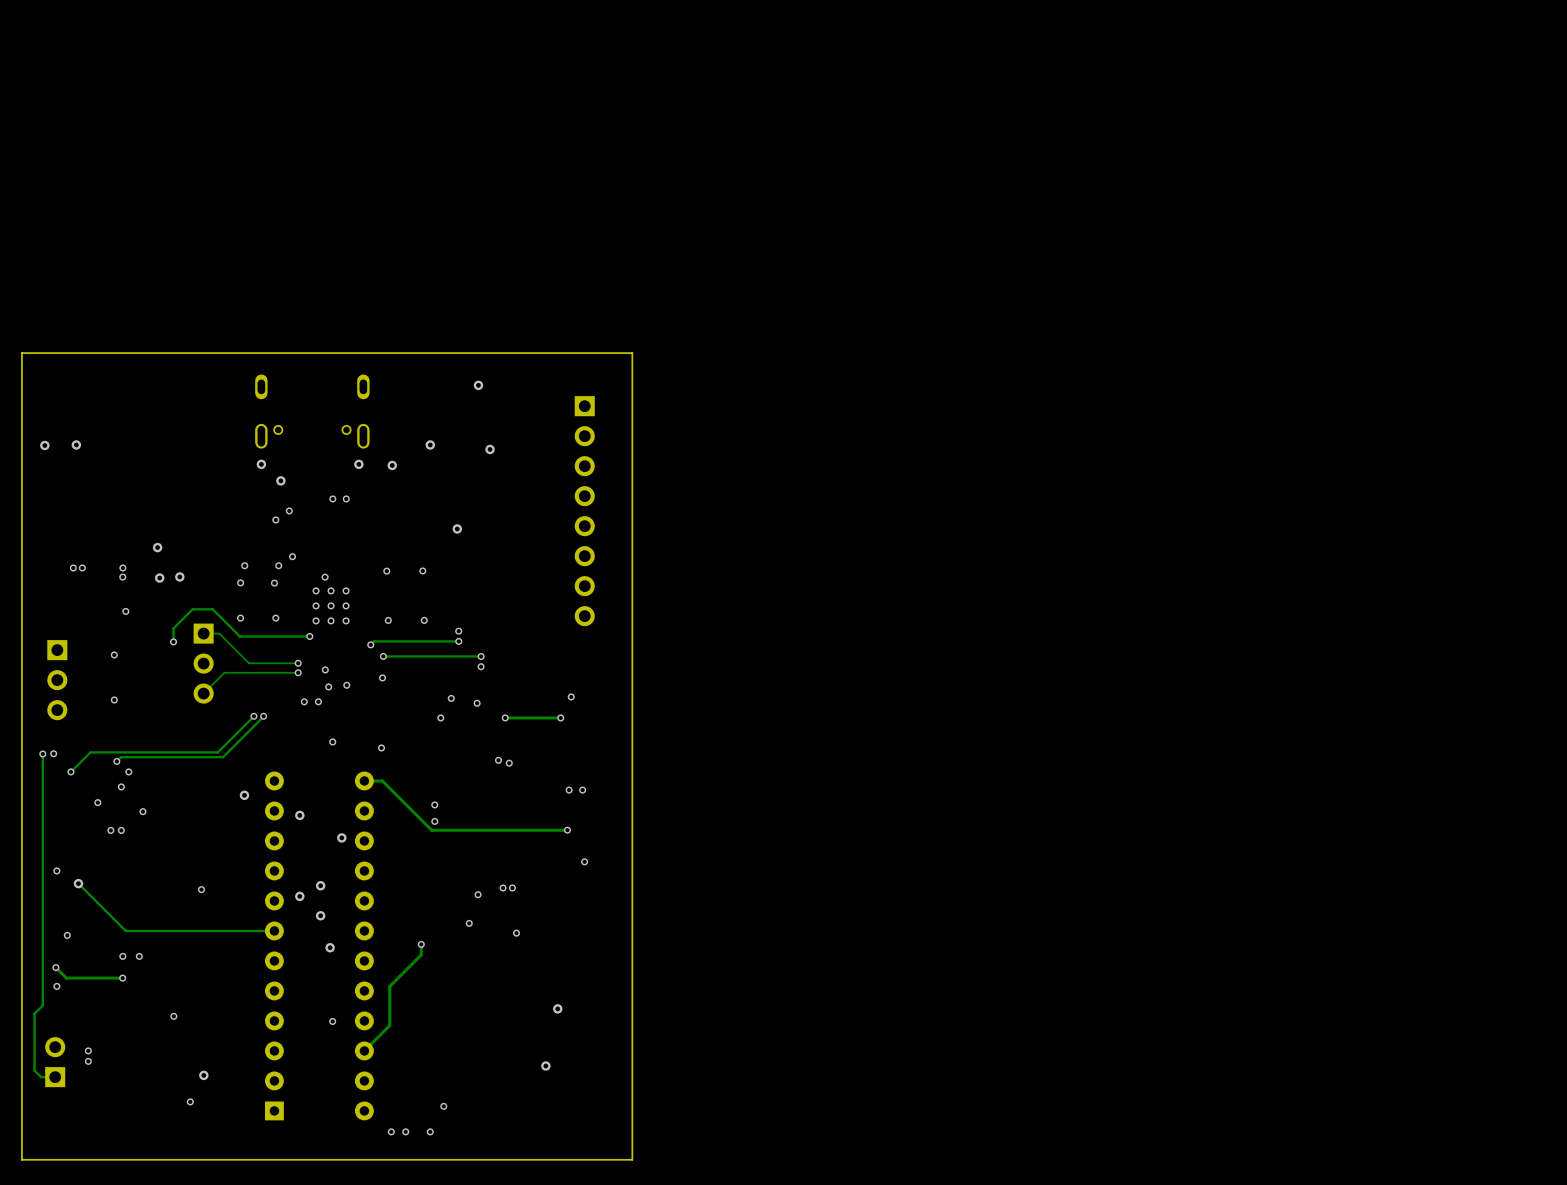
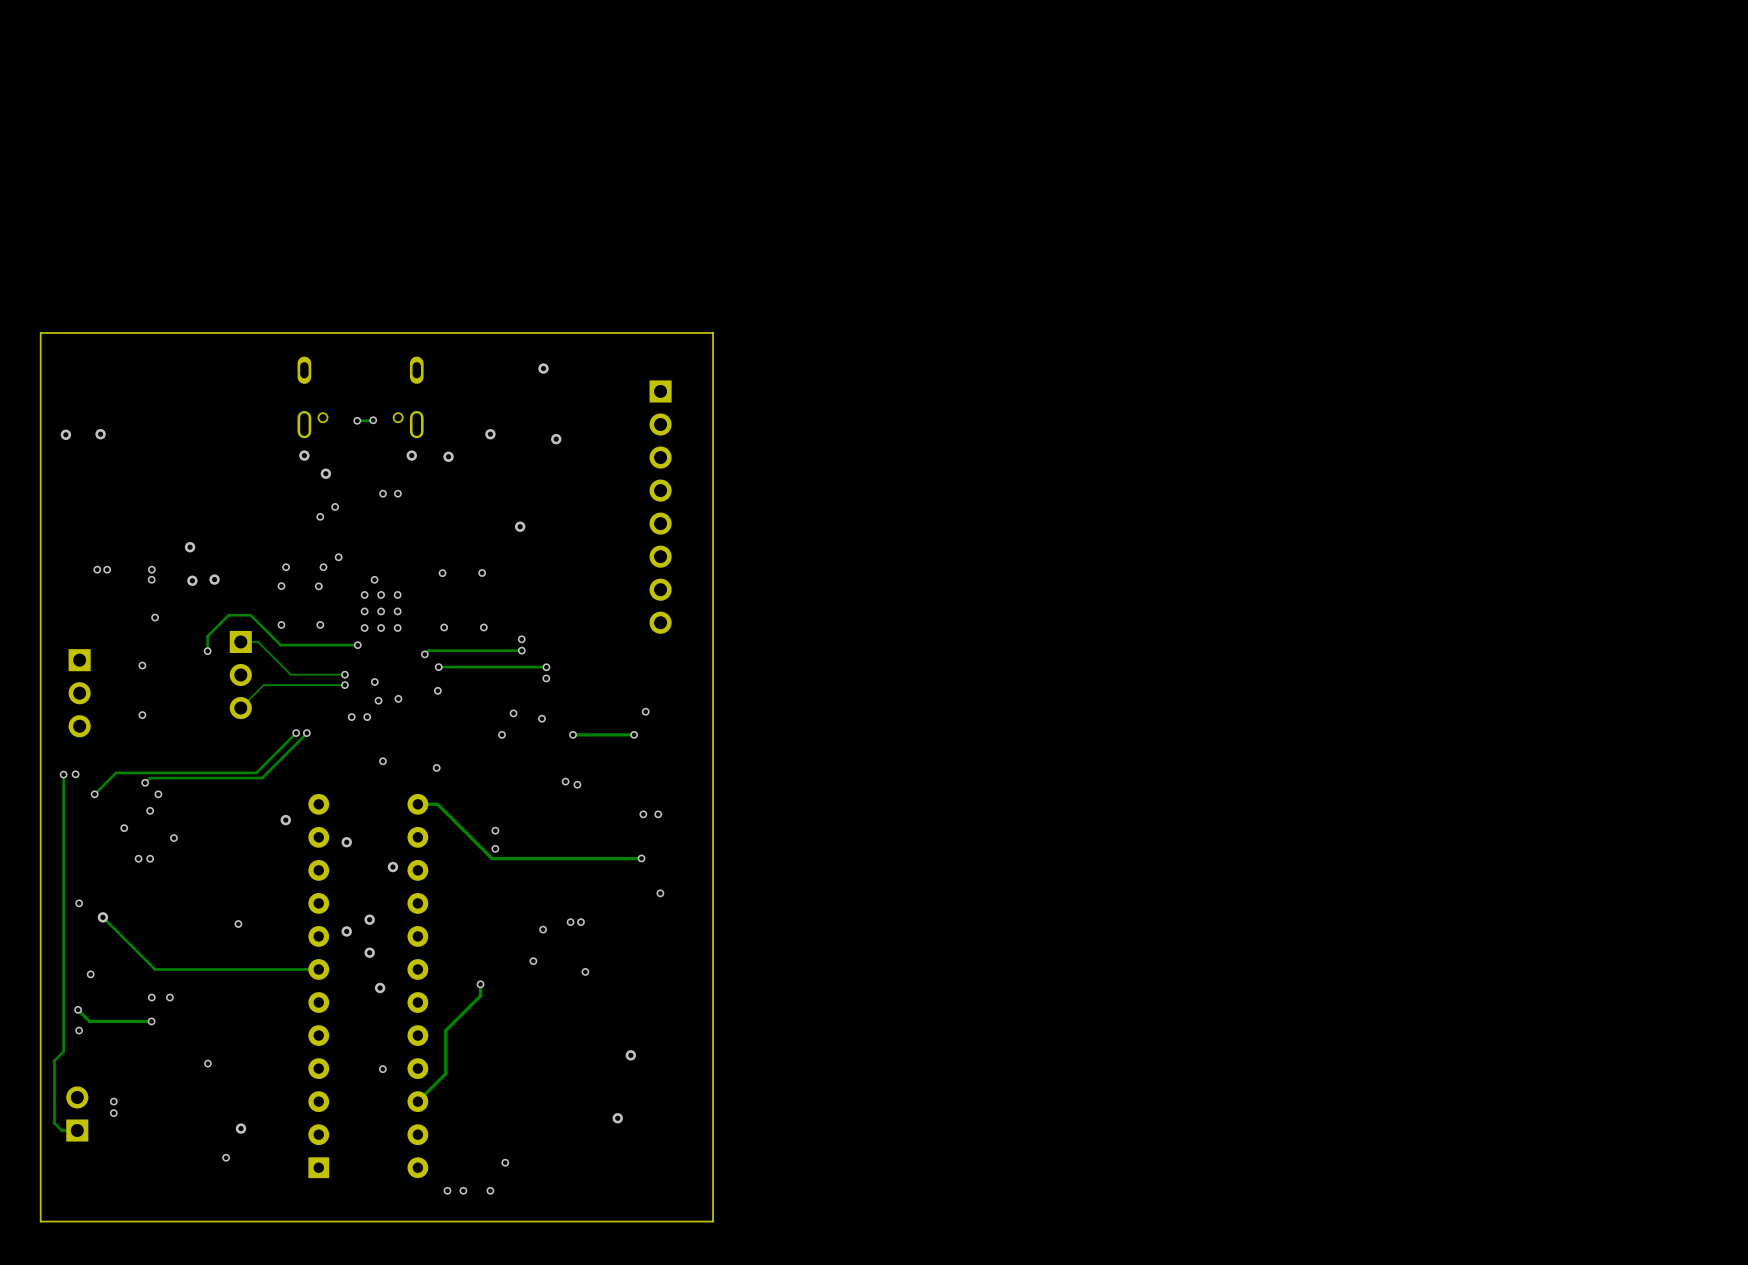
via: none -> (357, 420)
track: none -> (373, 420) (357, 420)
via: none -> (373, 420)

